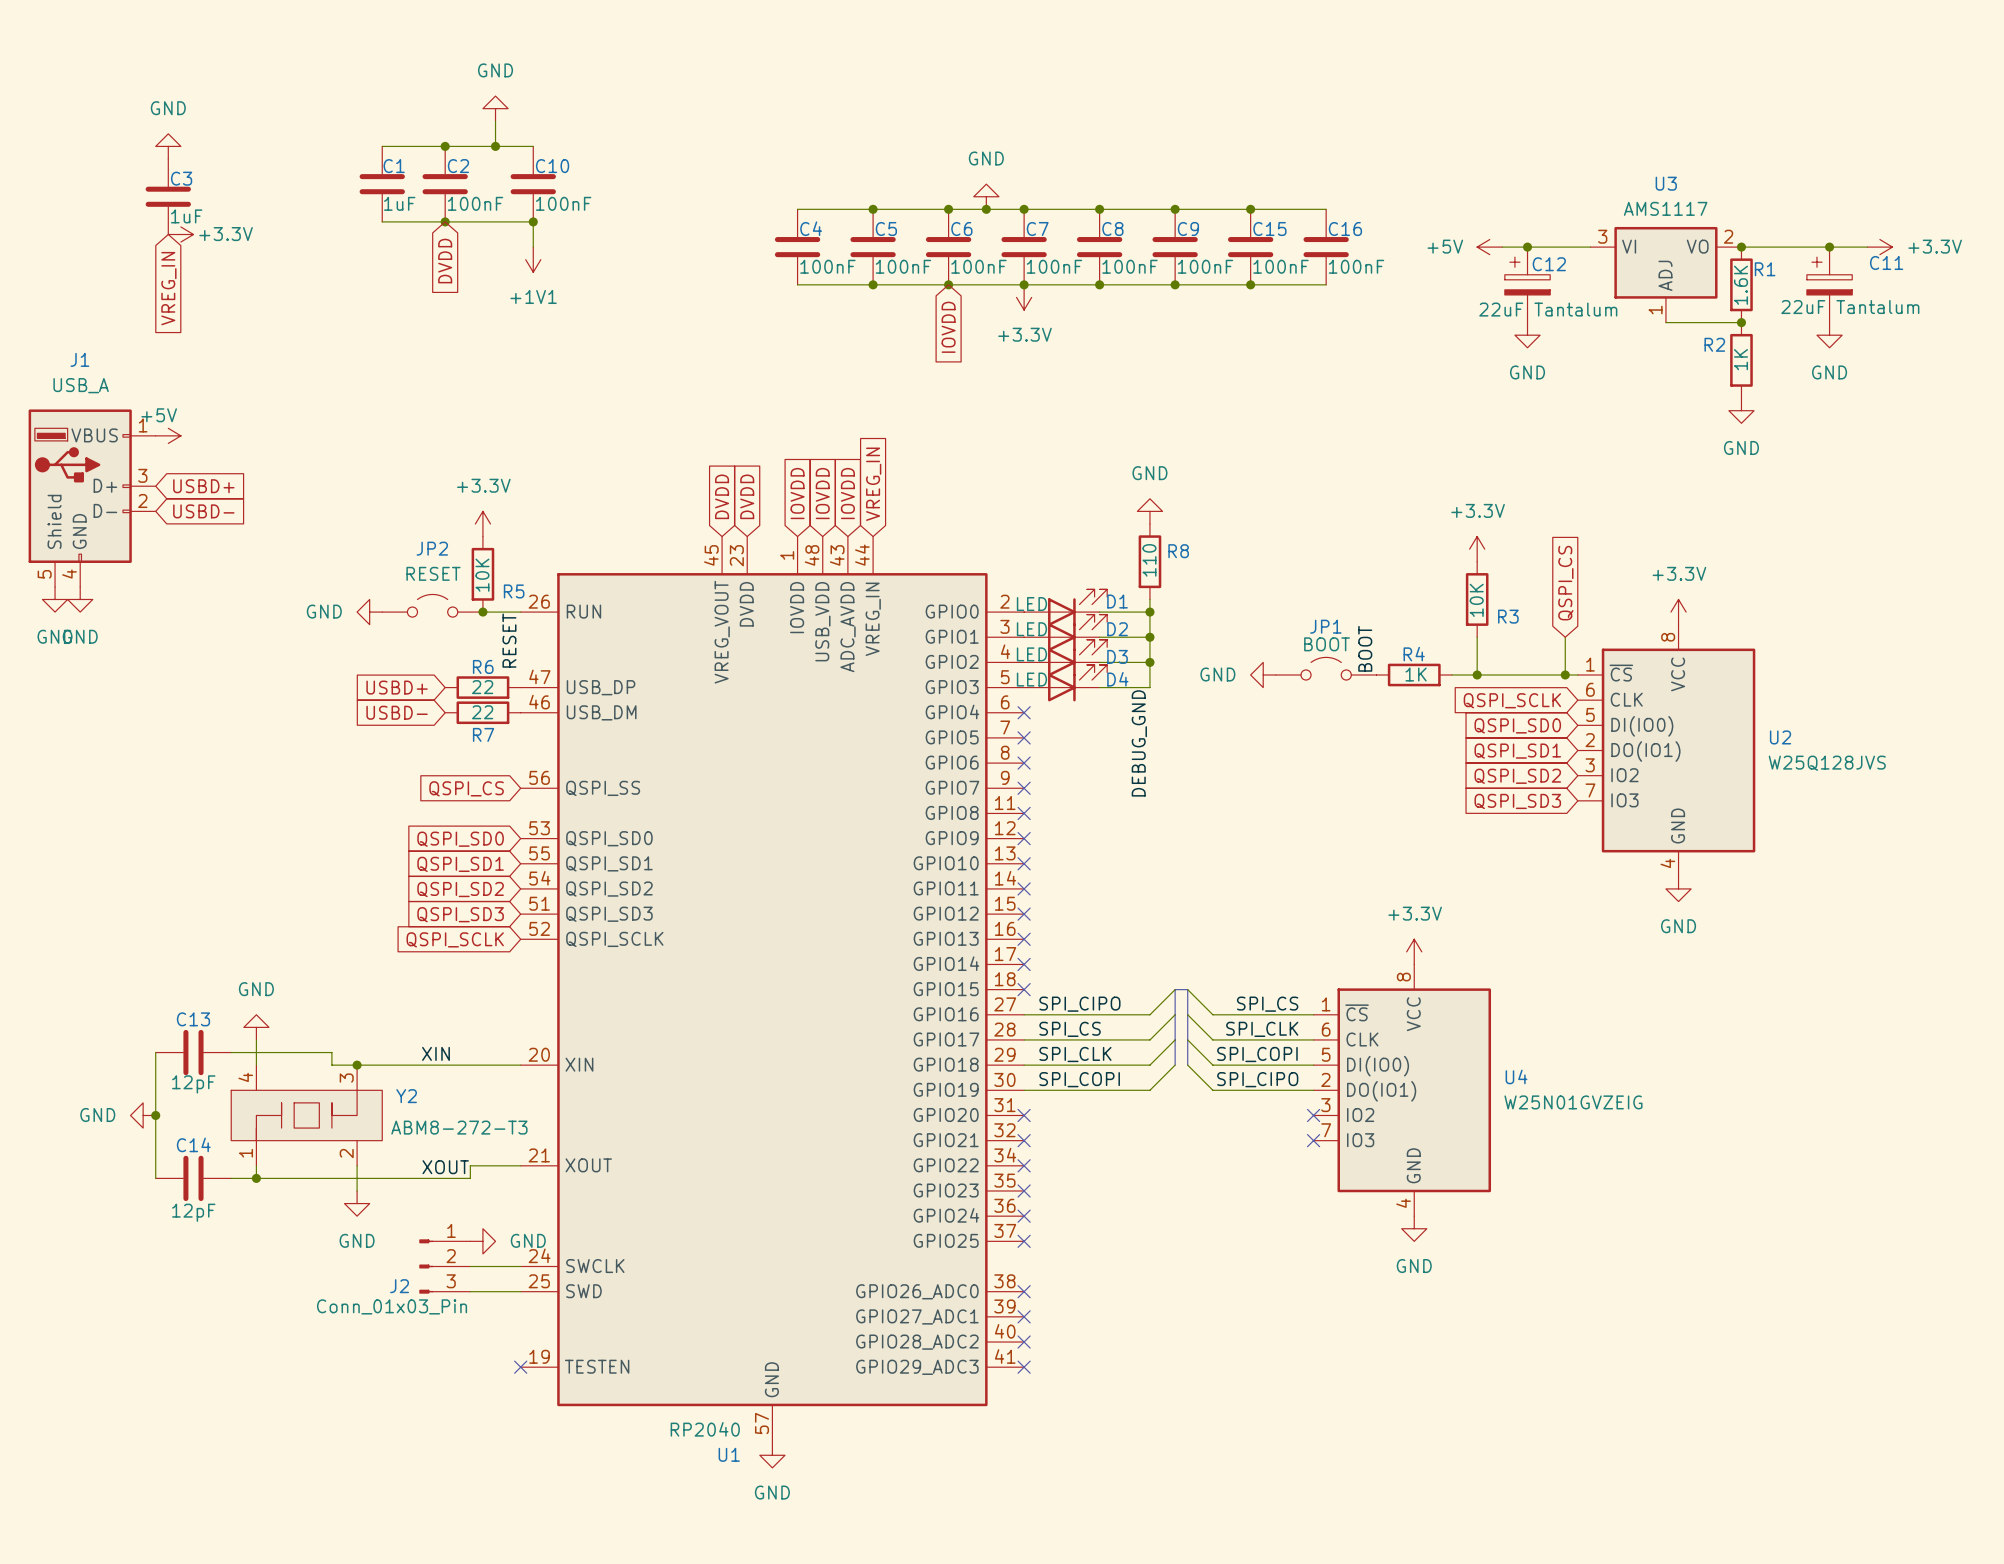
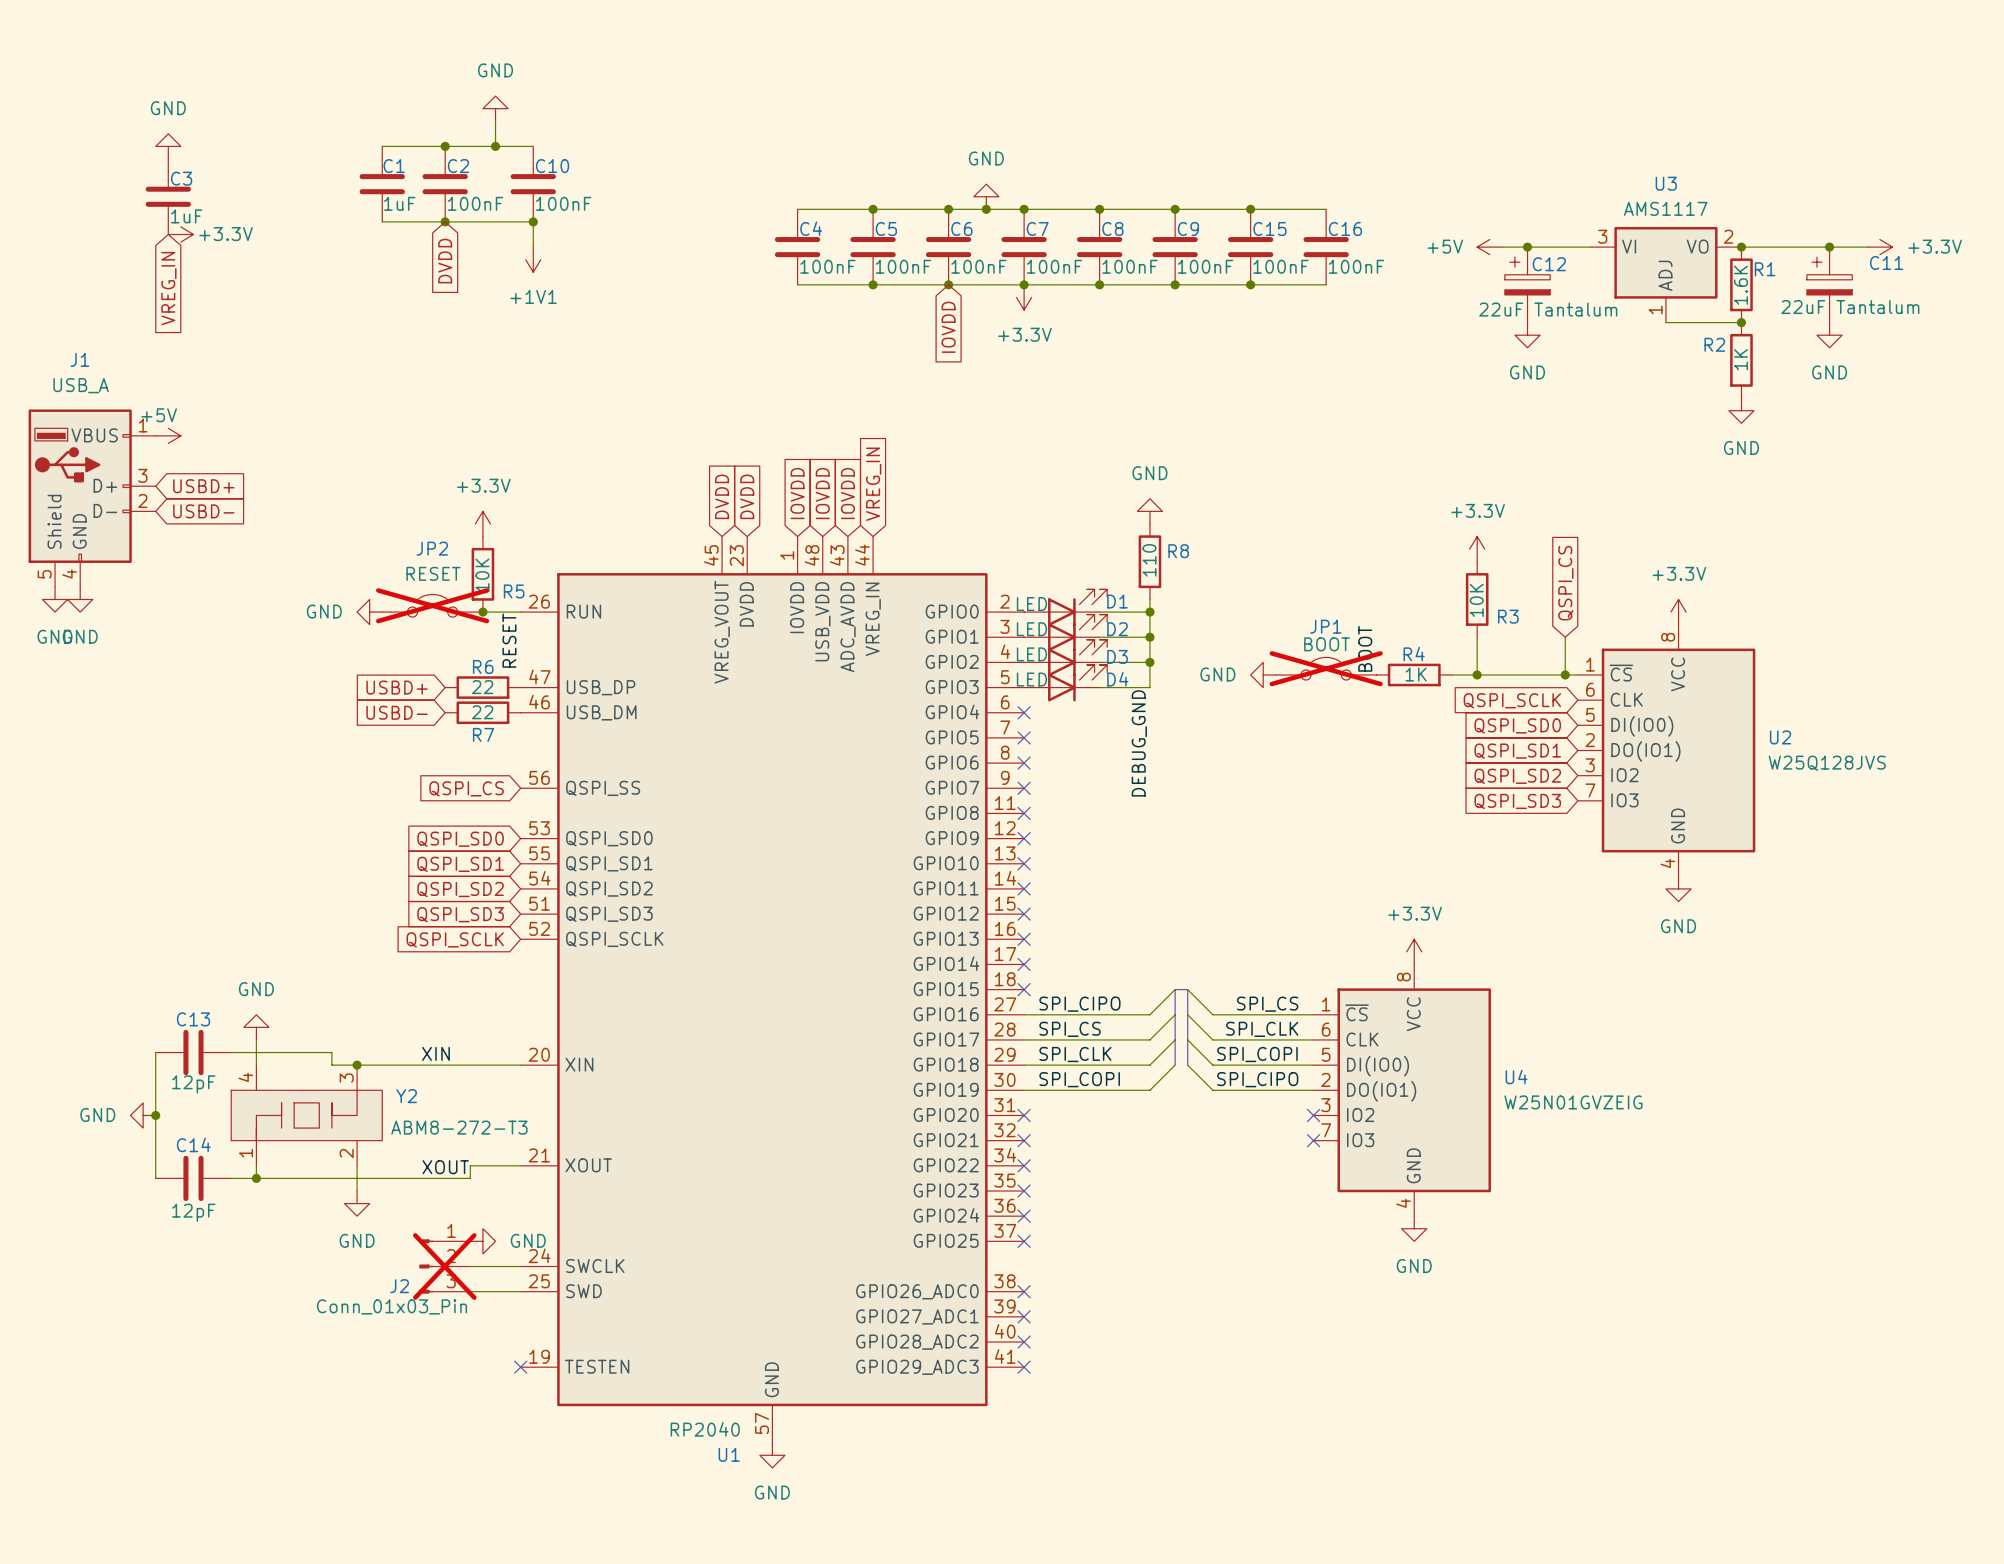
JP2 do-not-place cross: none -> (432, 605)
JP1 do-not-place cross: none -> (1326, 668)
J2 do-not-place cross: none -> (444, 1266)

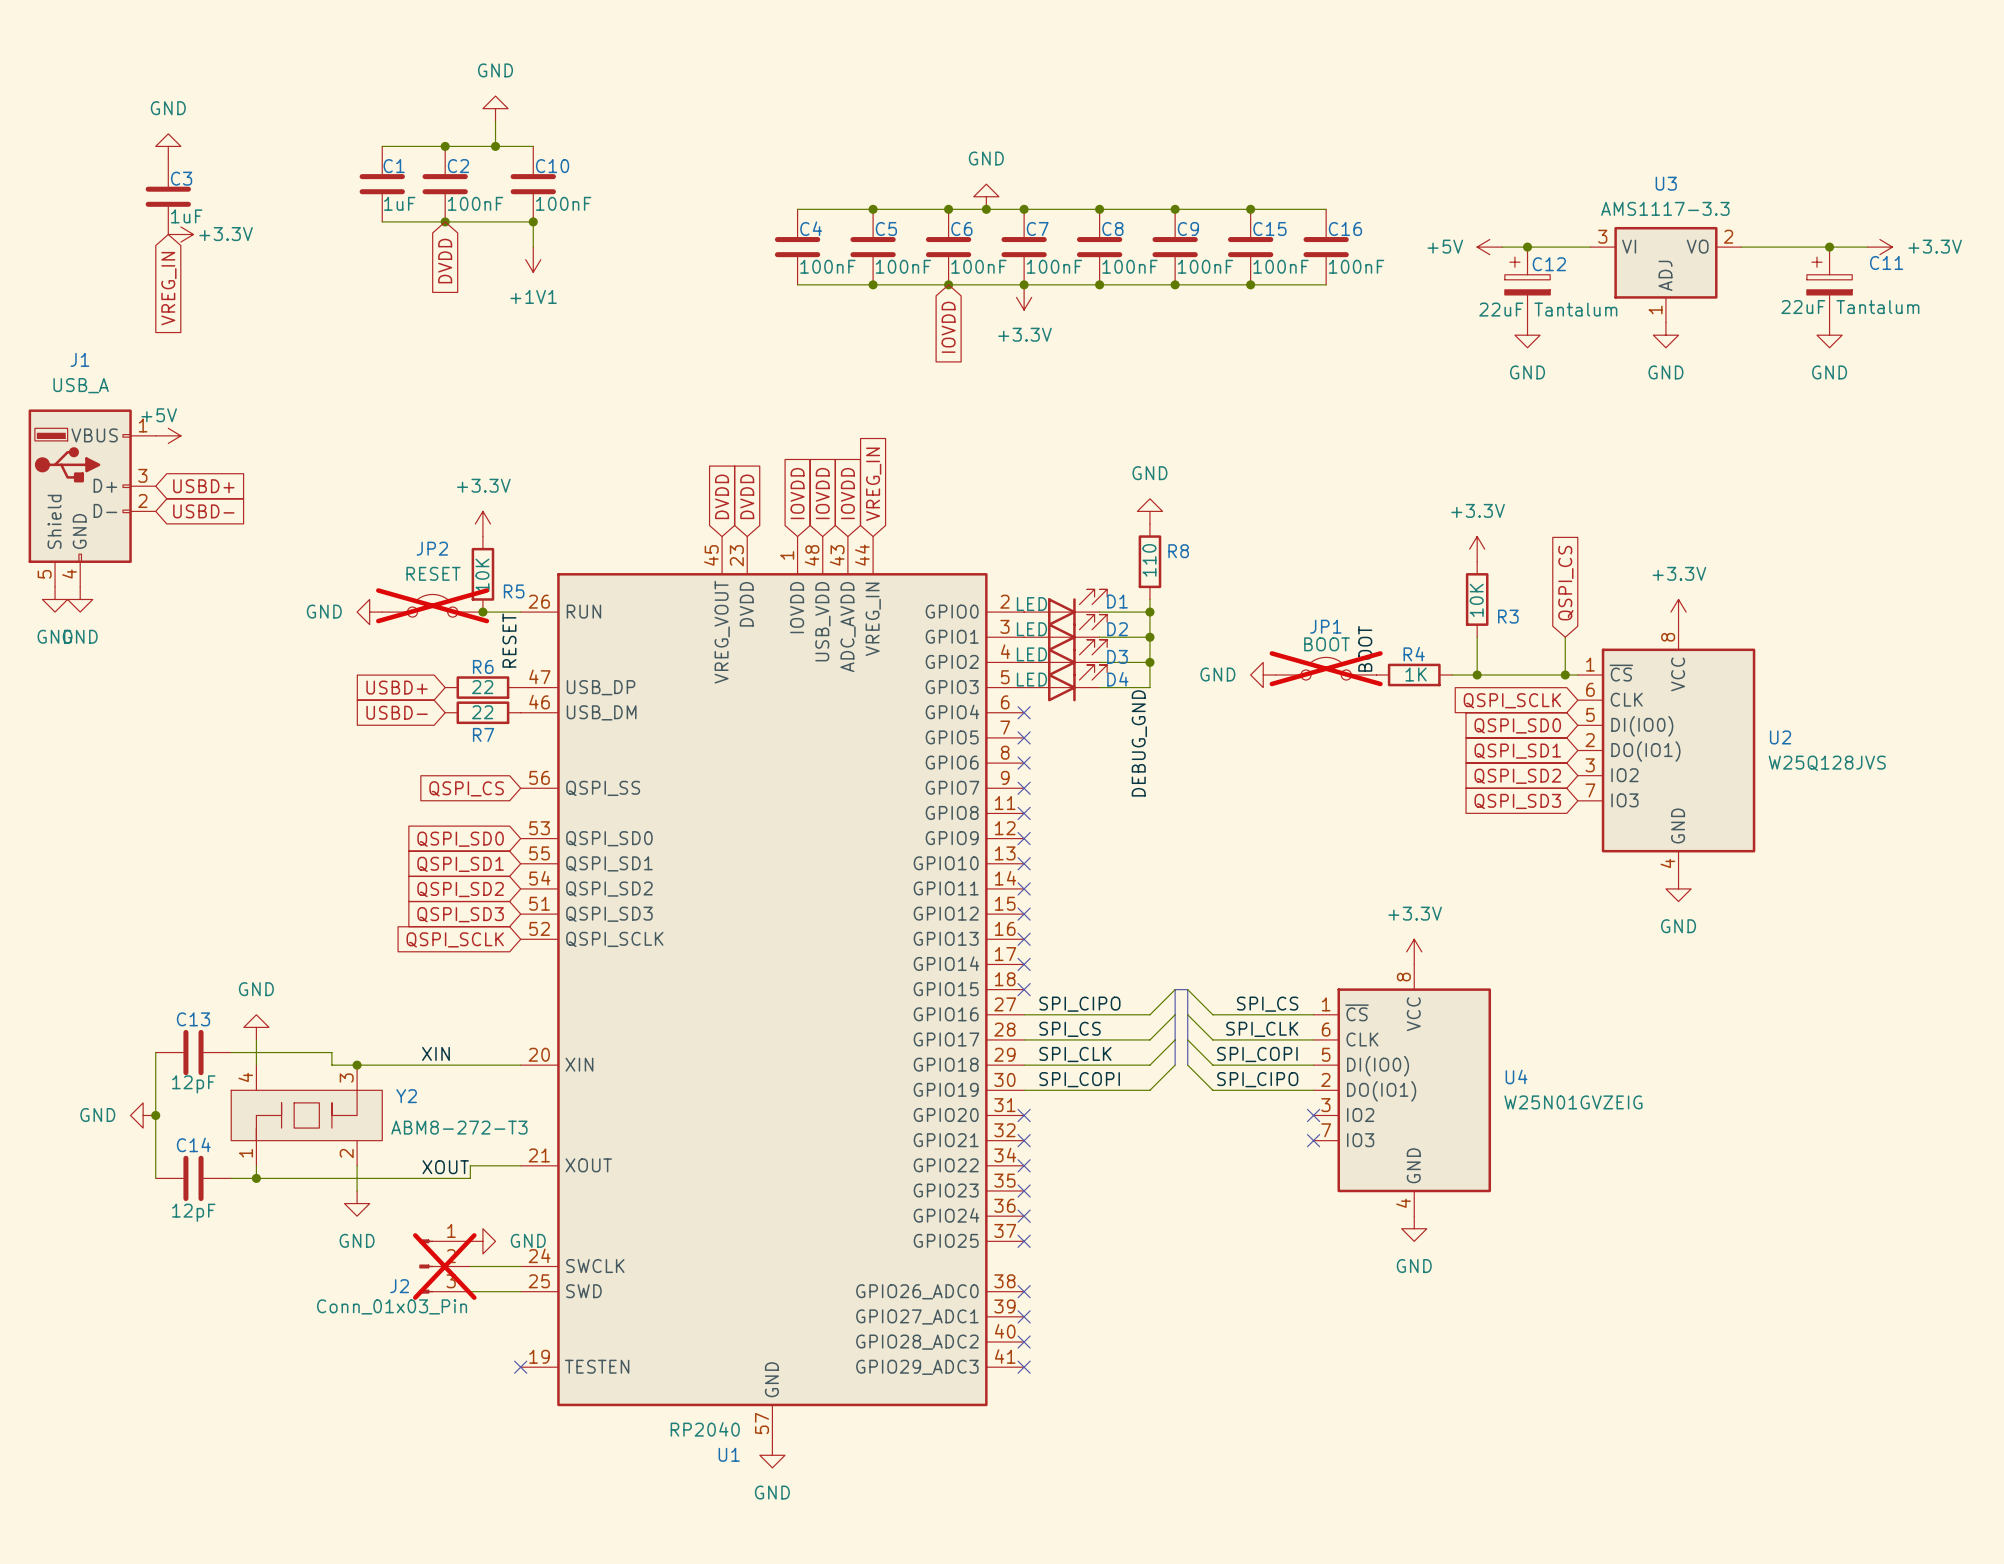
U3 value: AMS1117 (1665, 208) -> AMS1117-3.3 (1665, 208)
junction: (1741, 247) -> none
R1: 1.6K (1741, 284) -> none
wire: (1665, 322) (1741, 322) -> none
junction: (1741, 322) -> none
R2: 1K (1741, 360) -> none
power symbol position: GND (1741, 410) -> GND (1665, 335)

